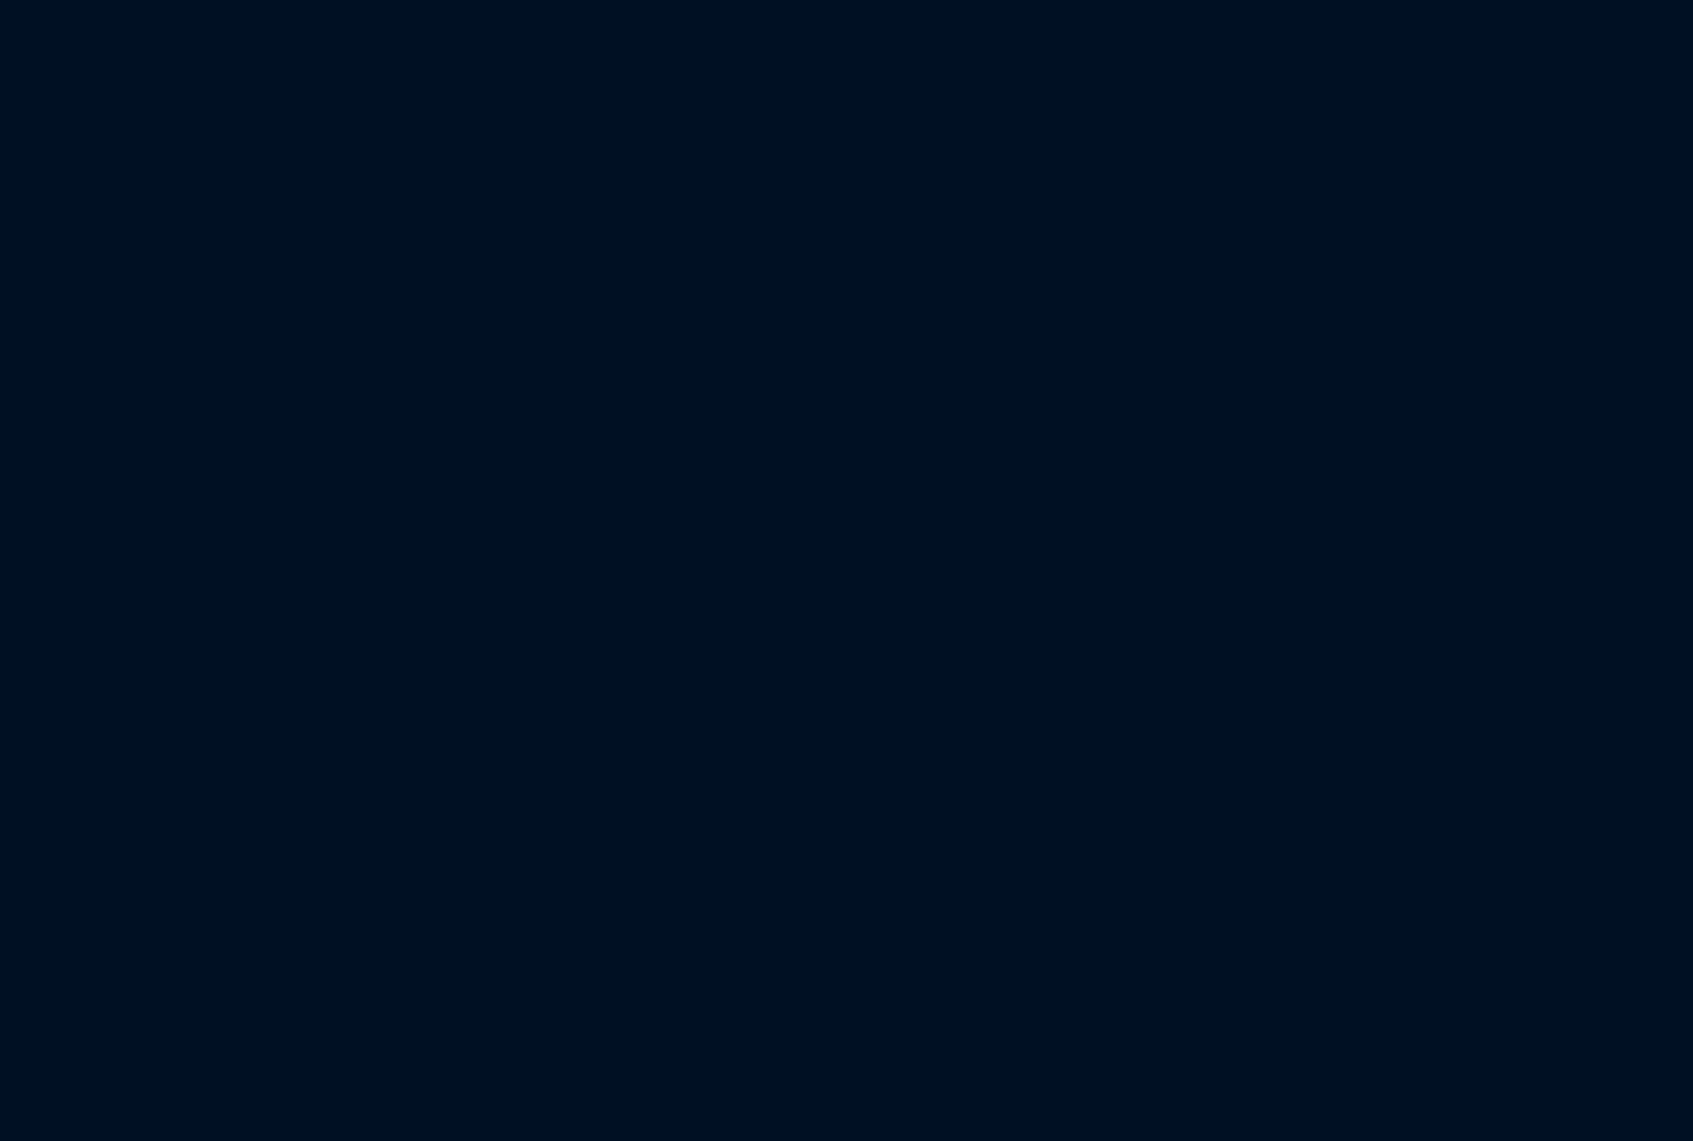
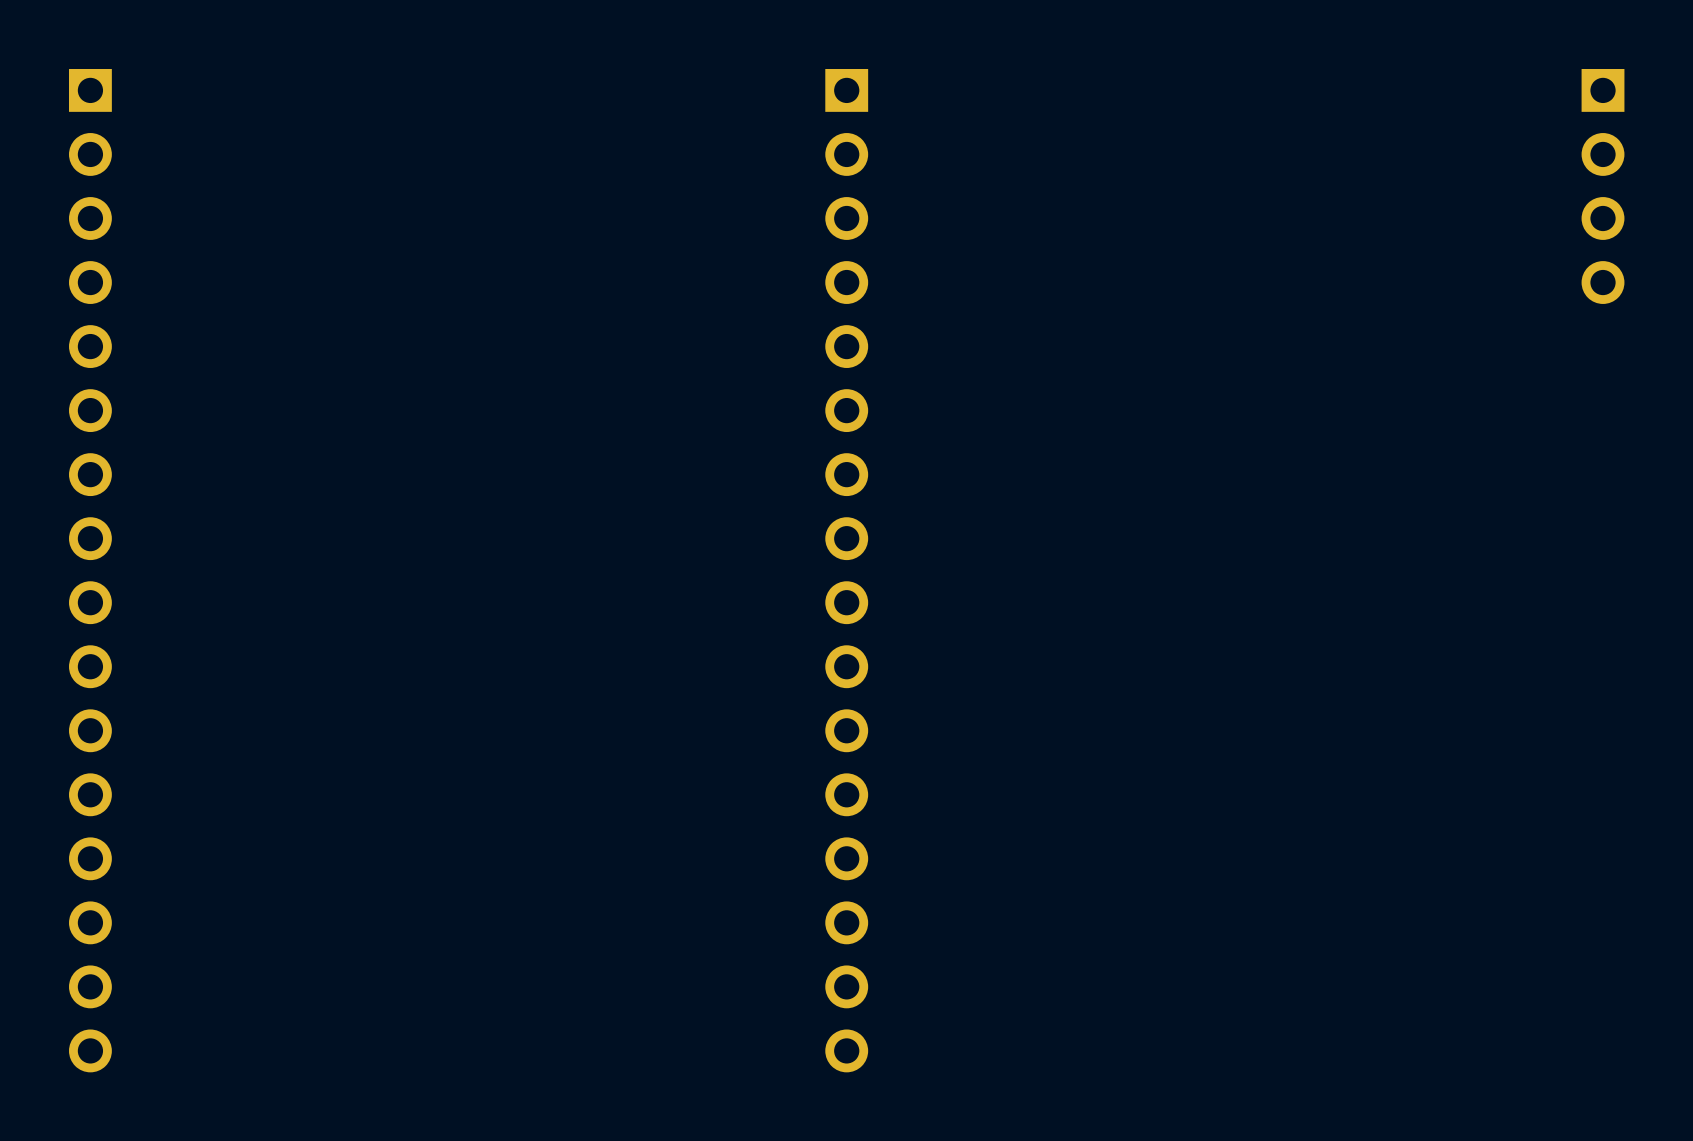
part: none -> (1603, 186)
part: none -> (90, 570)
part: none -> (846, 570)

